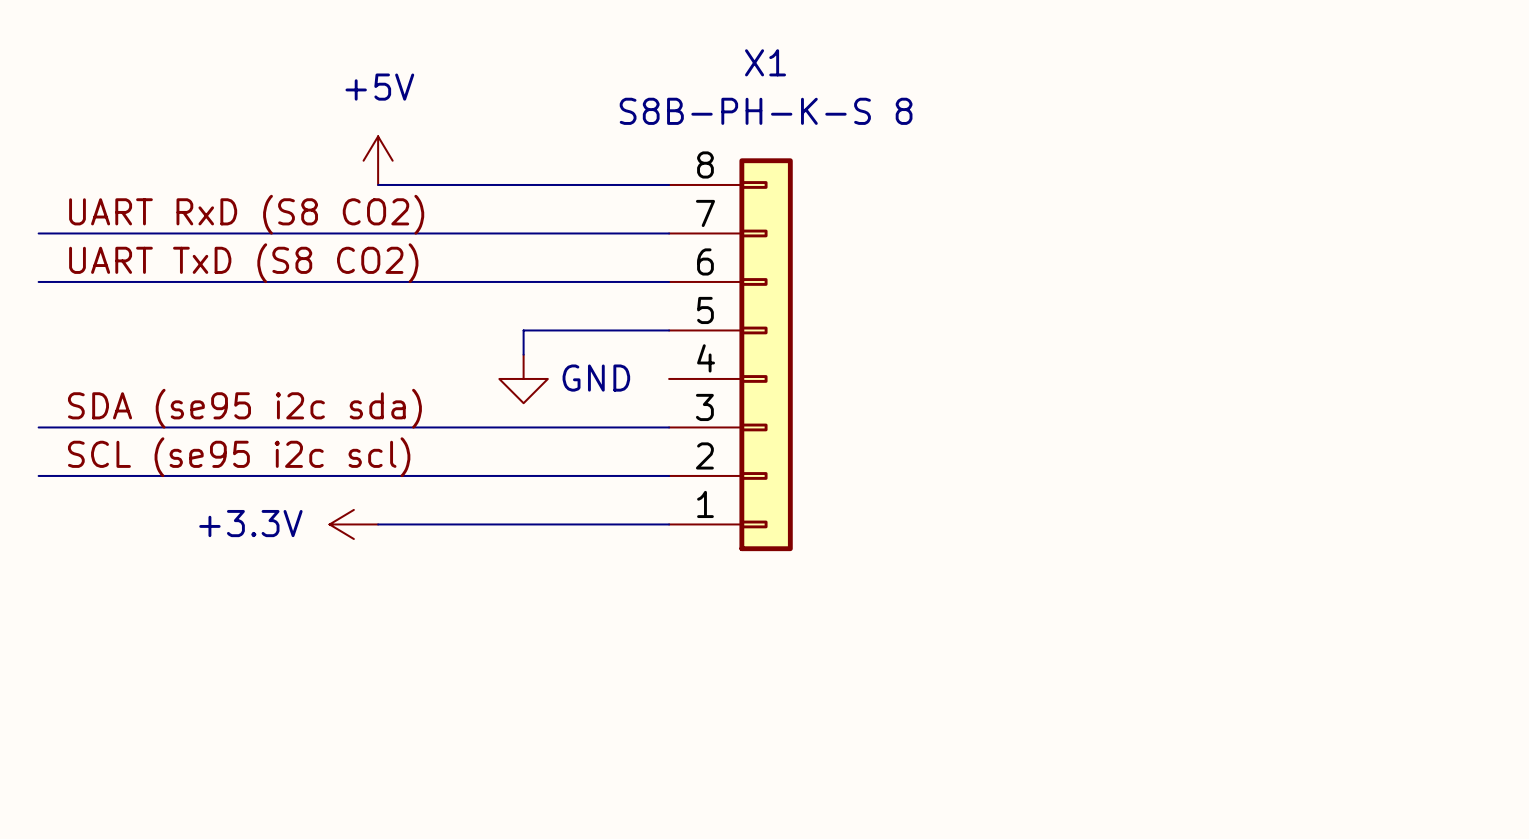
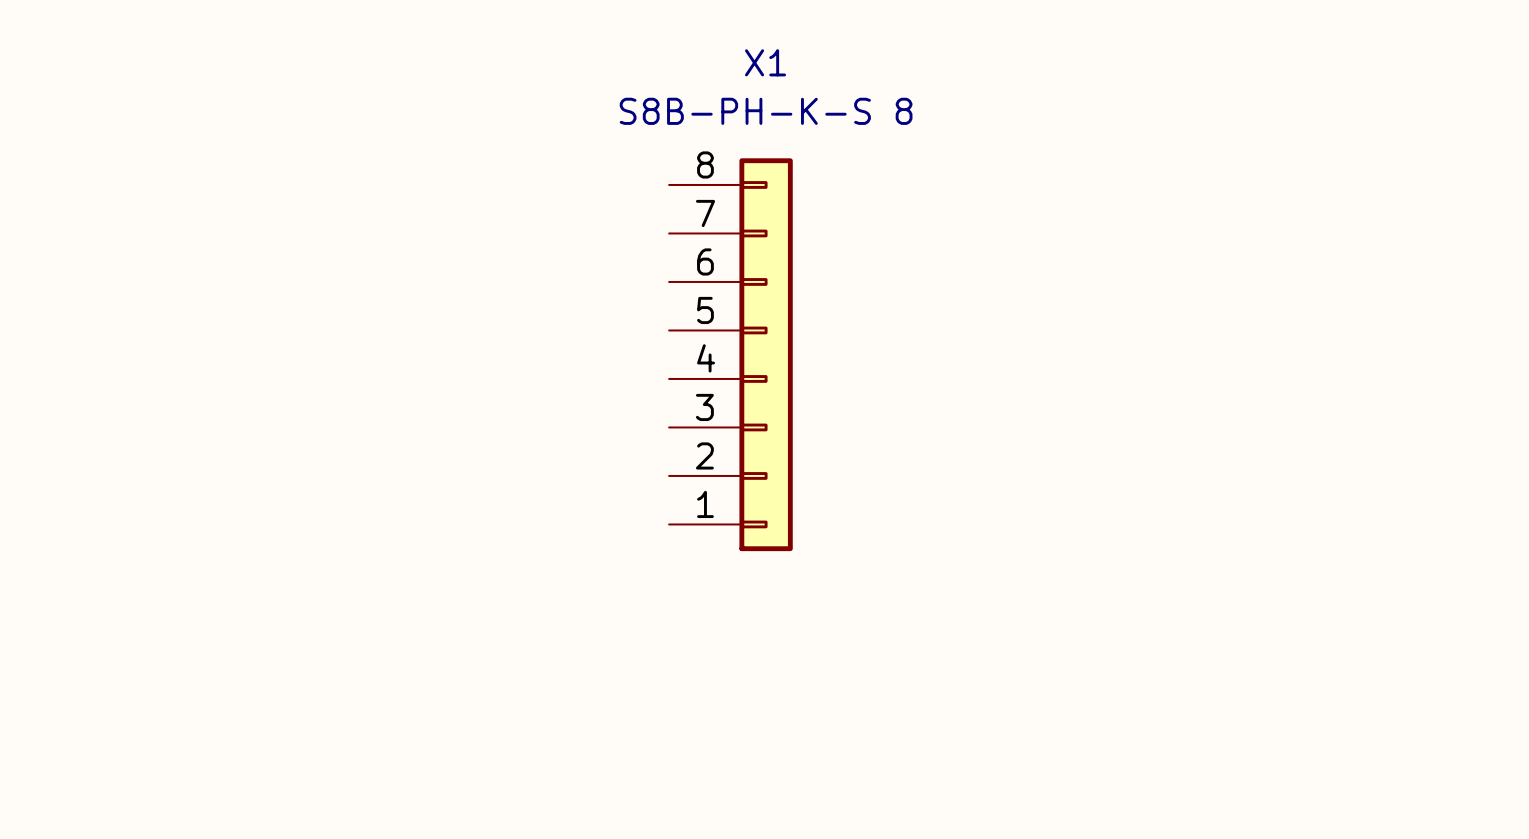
power symbol: +5V (378, 160) -> none
wire: (378, 184) (669, 184) -> none
label: UART RxD (S8 CO2) (246, 214) -> none
wire: (38, 233) (669, 233) -> none
label: UART TxD (S8 CO2) (243, 263) -> none
wire: (38, 281) (669, 281) -> none
wire: (669, 330) (523, 330) (523, 354) -> none
power symbol: GND (523, 378) -> none
label: SDA (se95 i2c sda) (244, 408) -> none
wire: (38, 427) (669, 427) -> none
label: SCL (se95 i2c scl) (239, 457) -> none
wire: (38, 475) (669, 475) -> none
power symbol: +3.3V (353, 524) -> none
wire: (378, 524) (669, 524) -> none

